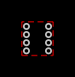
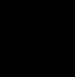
zone outline: (21, 21) (21, 55) (53, 55) (53, 21) (21, 21) -> none
via: (26, 26) -> none
via: (48, 26) -> none
via: (26, 34) -> none
via: (48, 34) -> none
via: (26, 42) -> none
via: (48, 42) -> none
via: (26, 50) -> none
via: (48, 50) -> none

